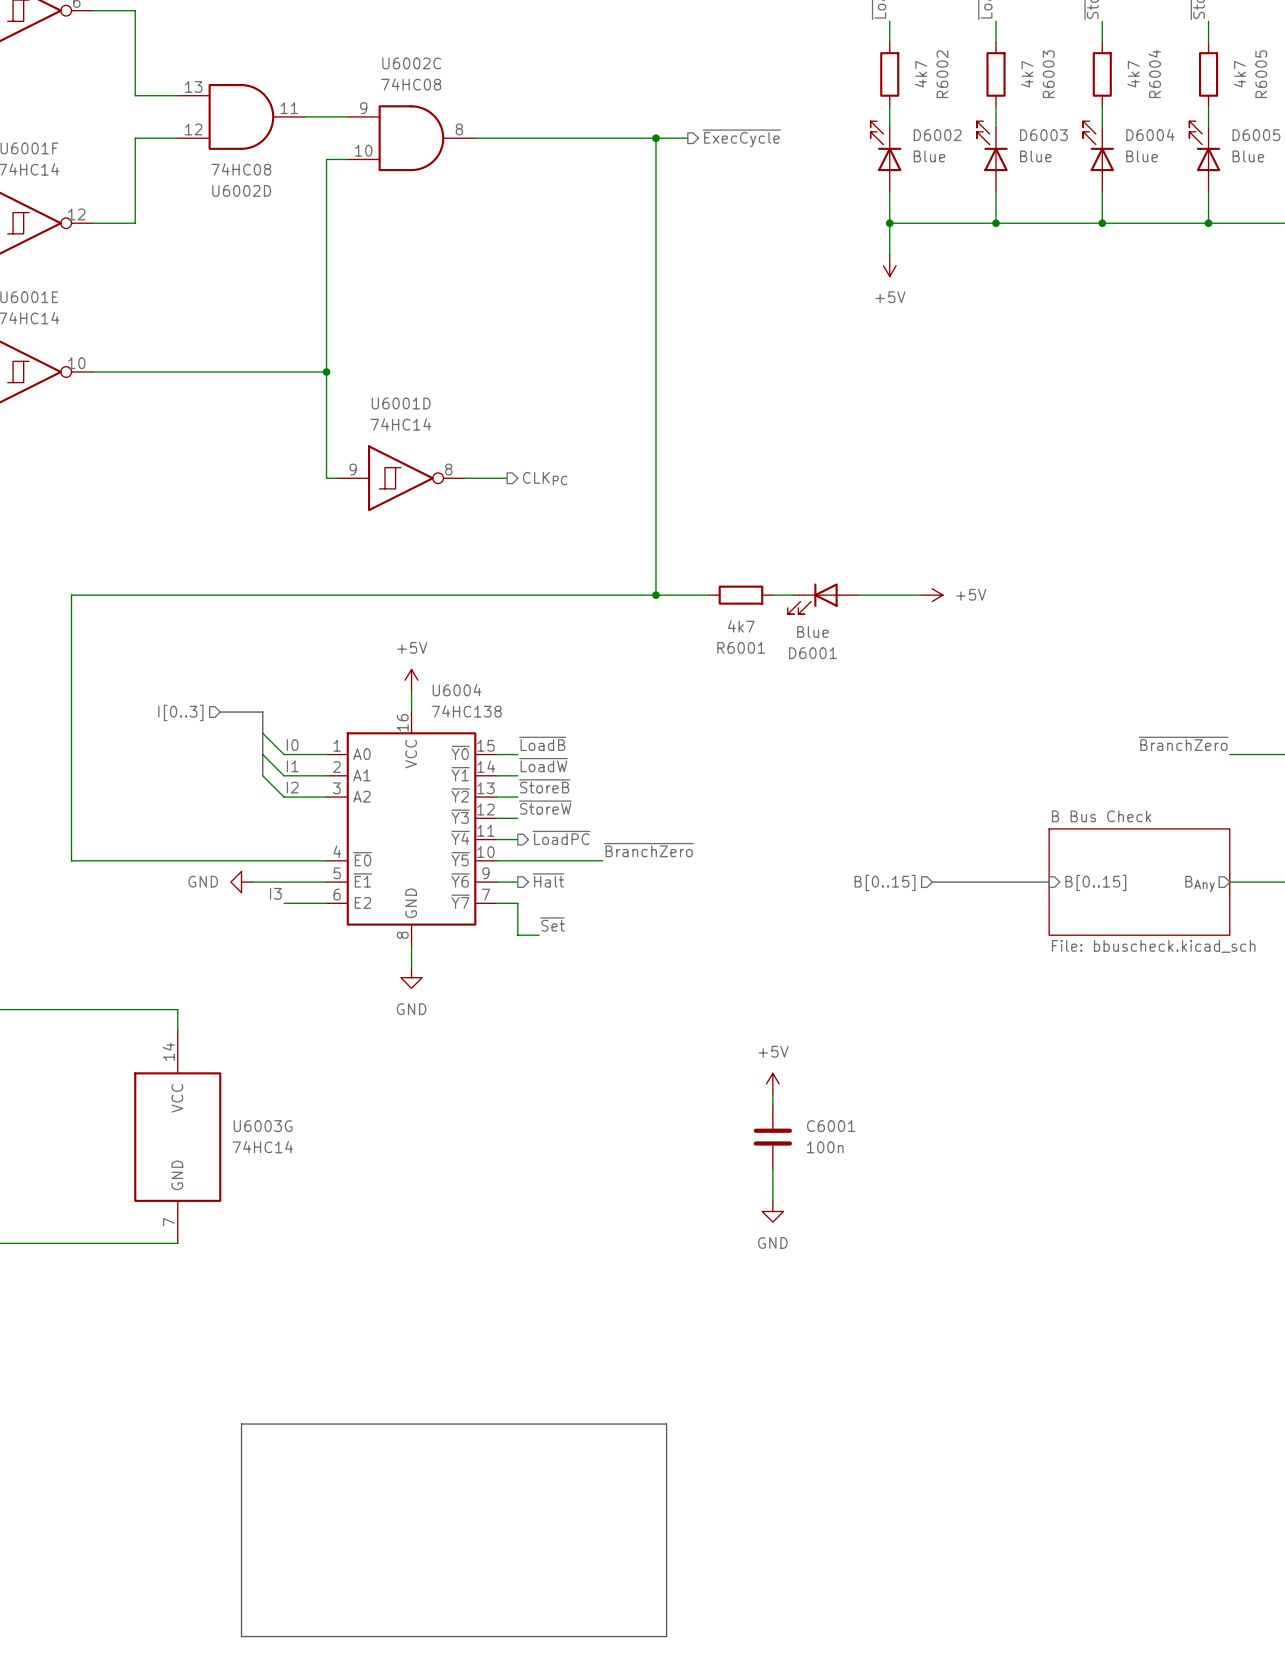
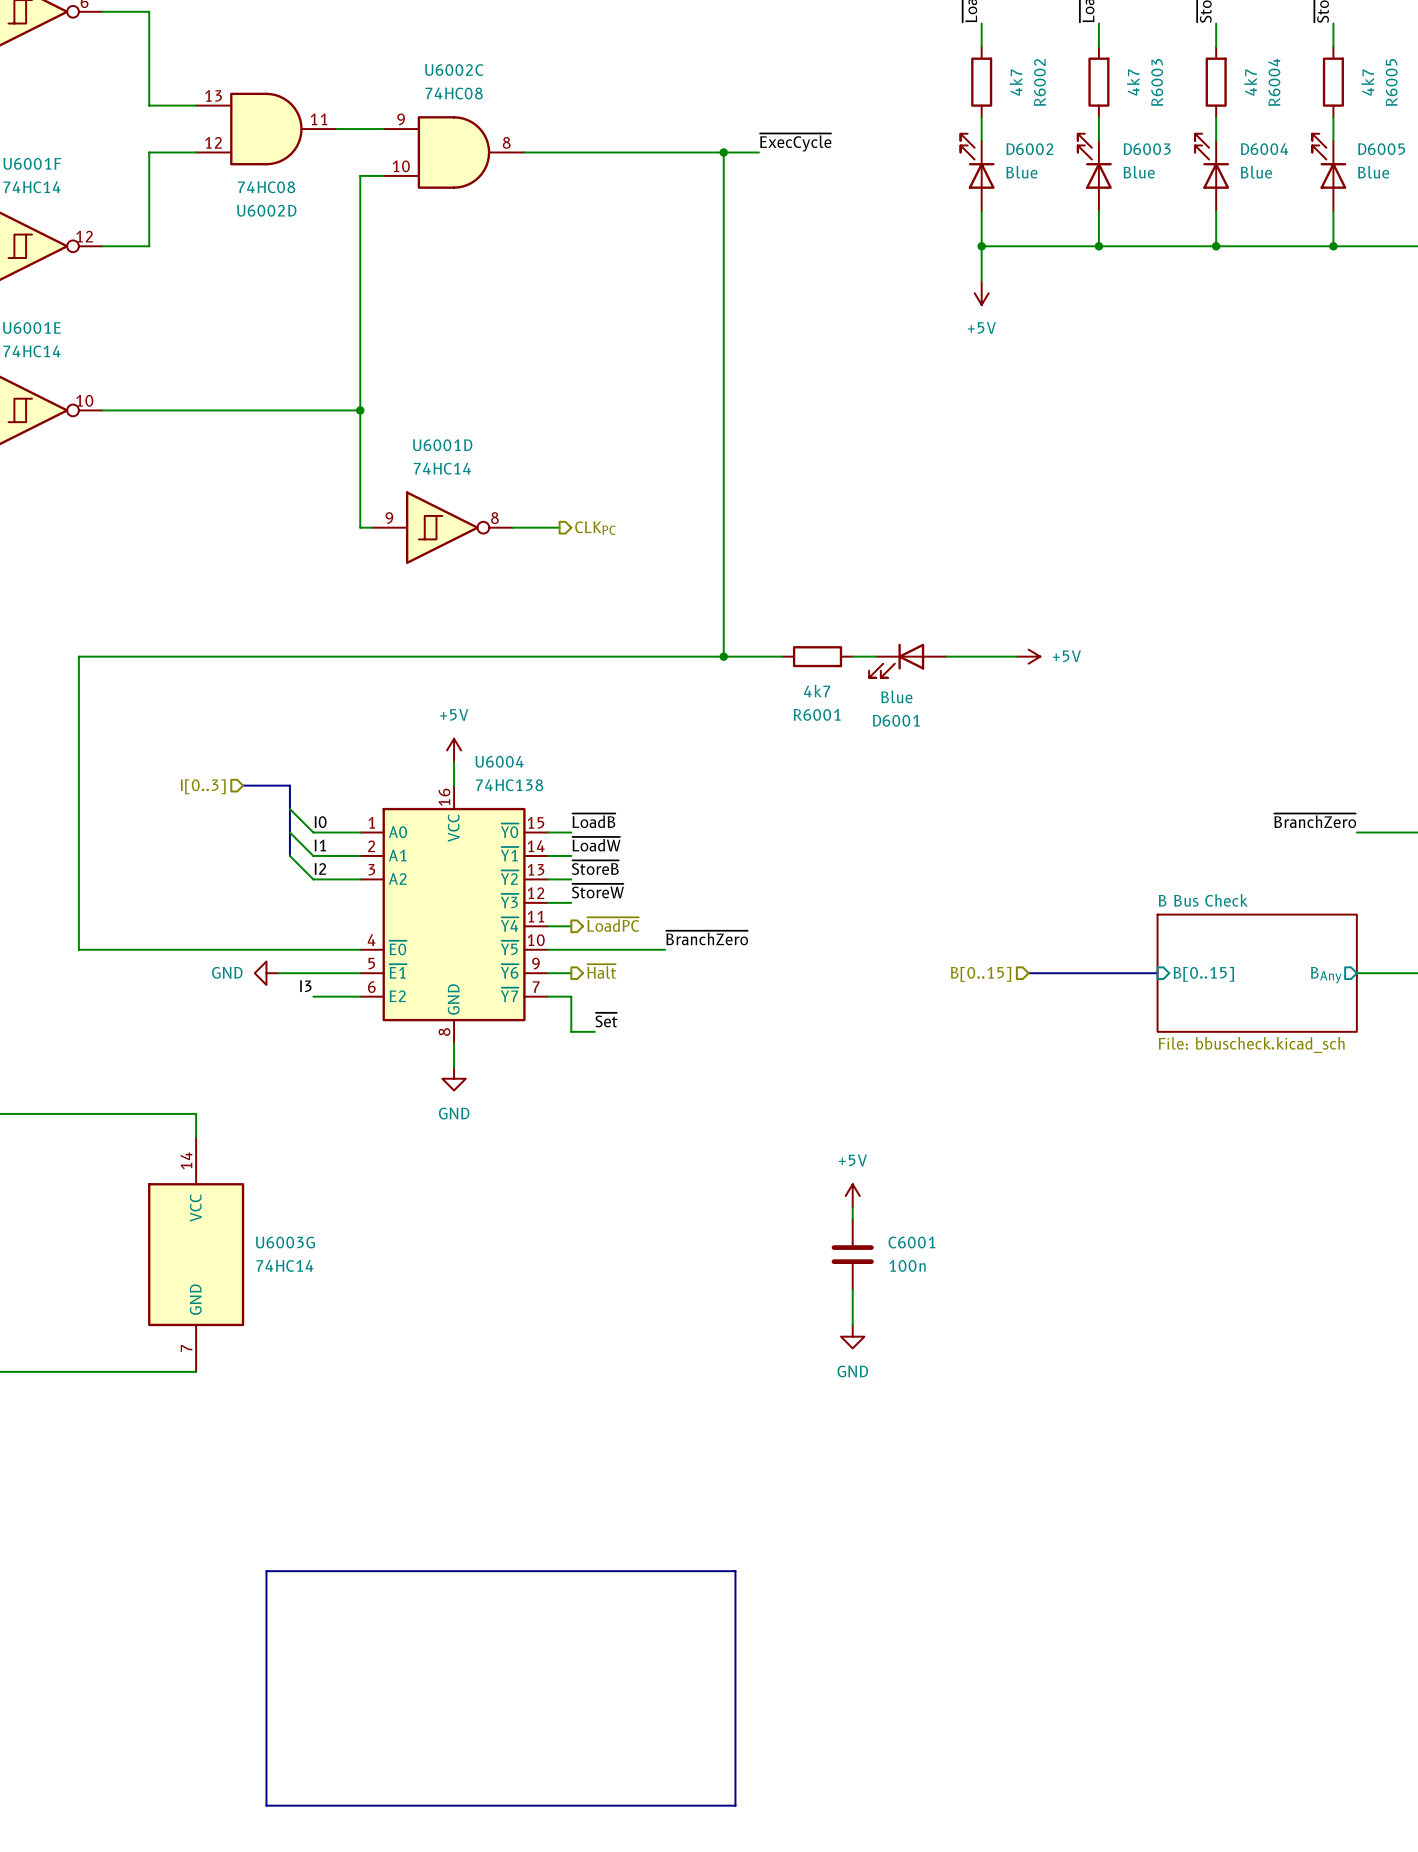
label: none -> ~{ExecCycle} (795, 142)
hierarchical label: ~{ExecCycle} (741, 138) -> none

